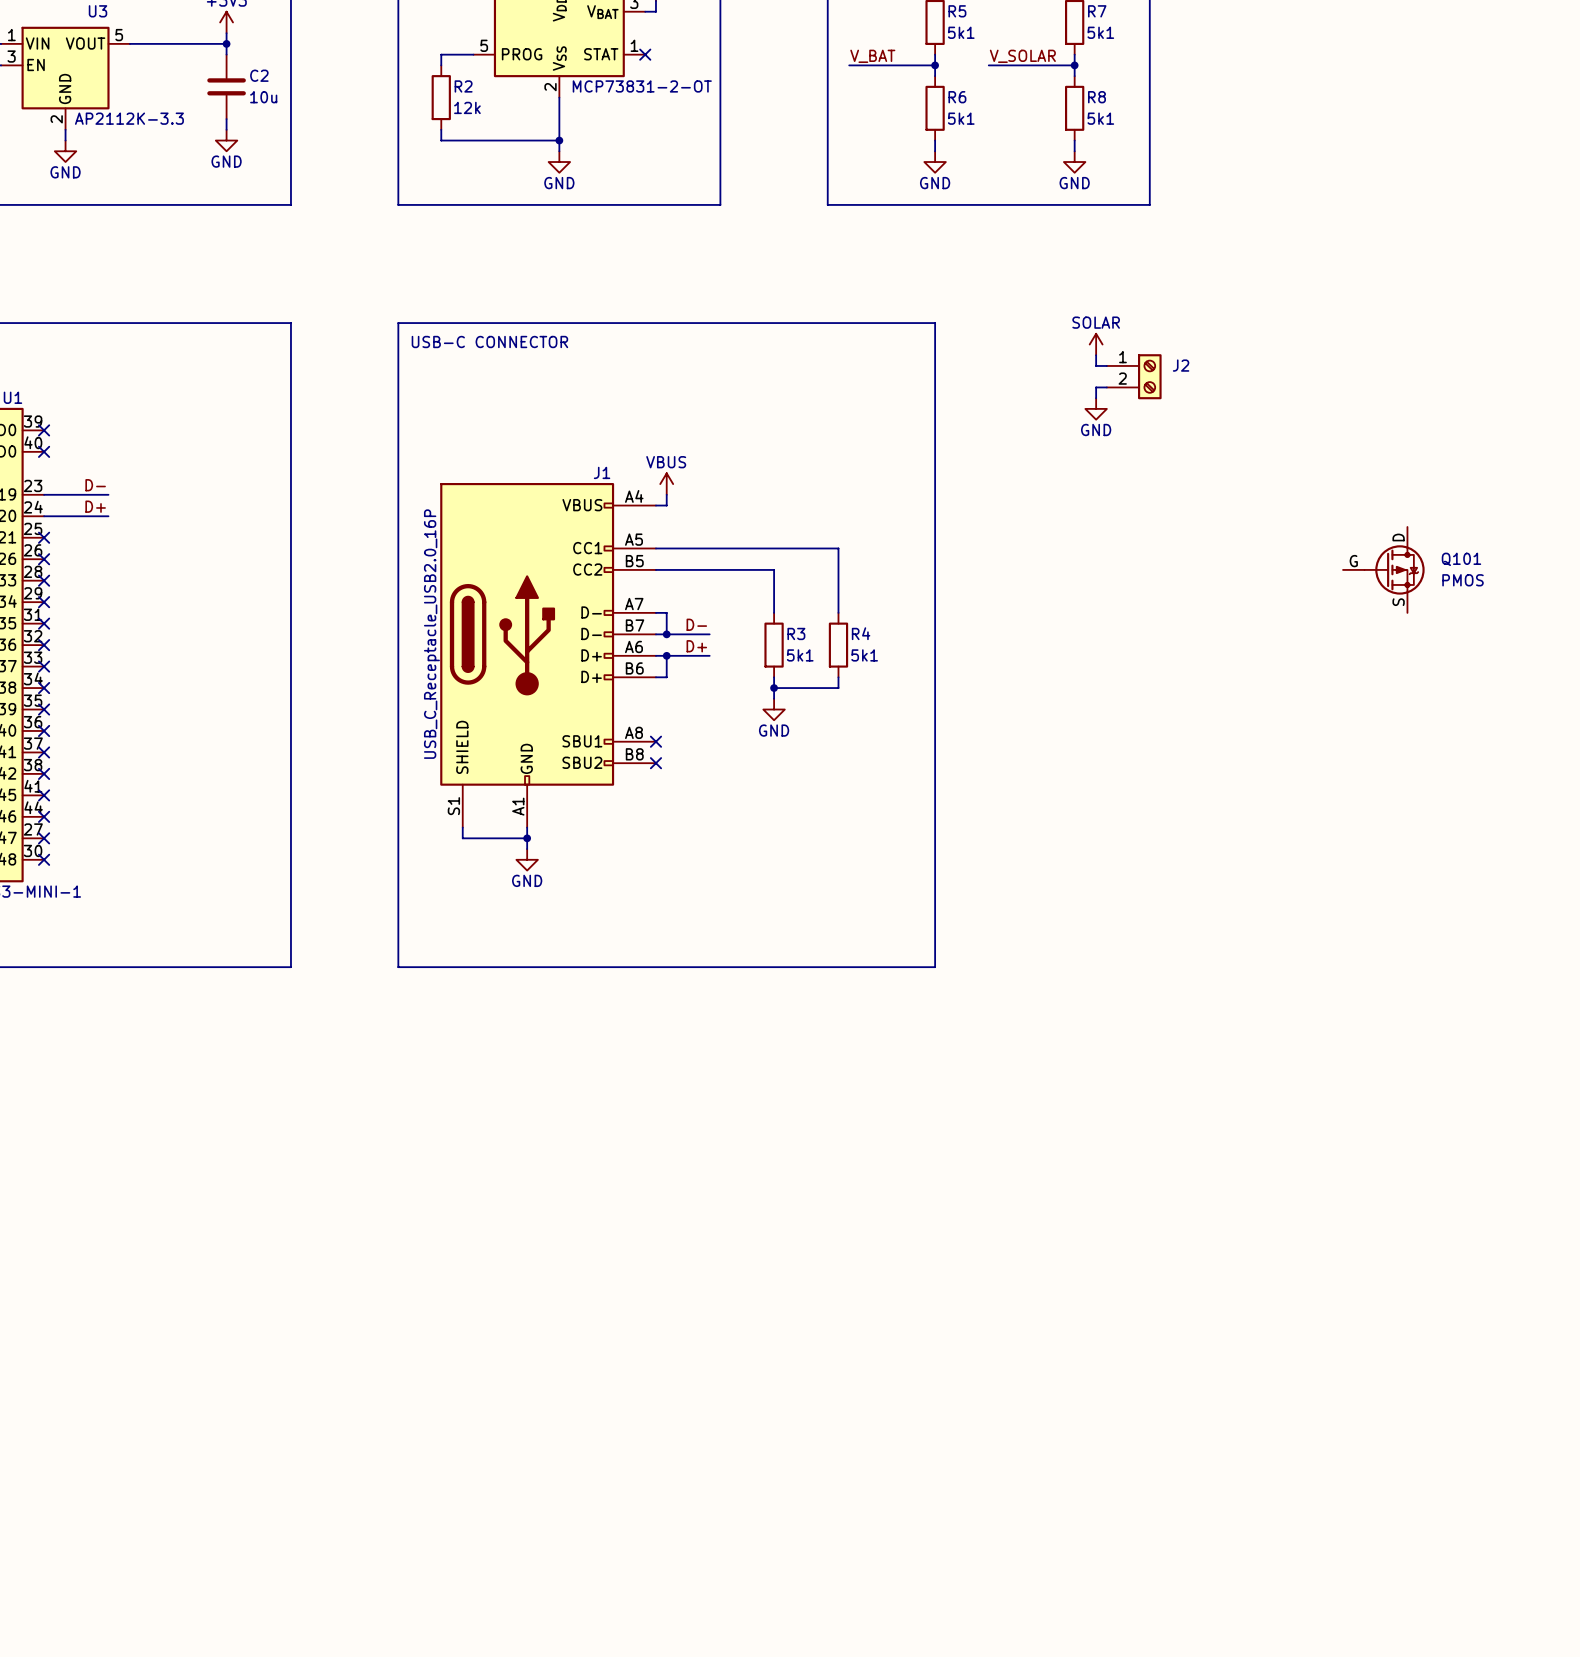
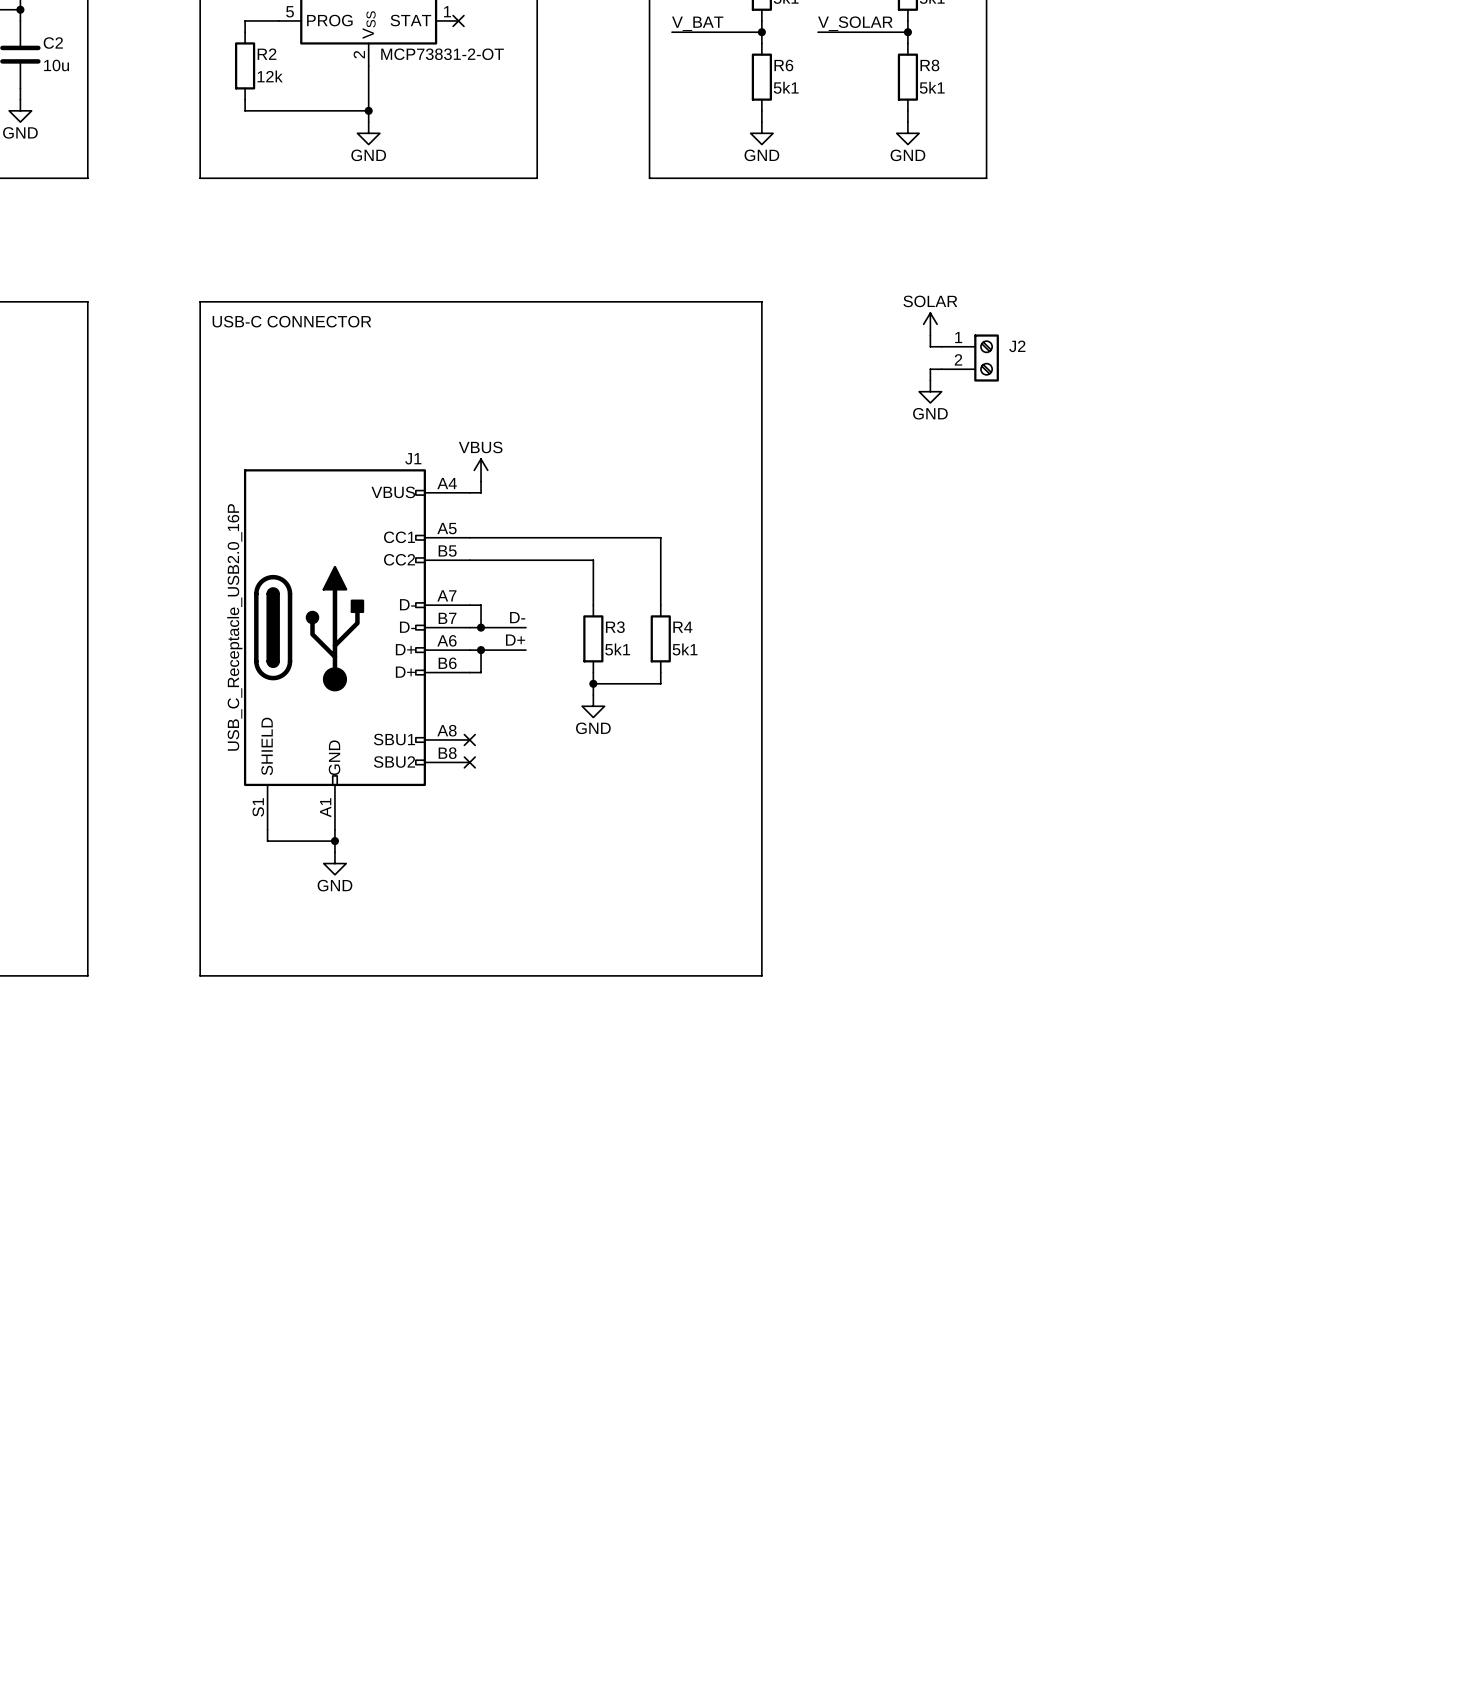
Q101: PMOS (1383, 569) -> none

